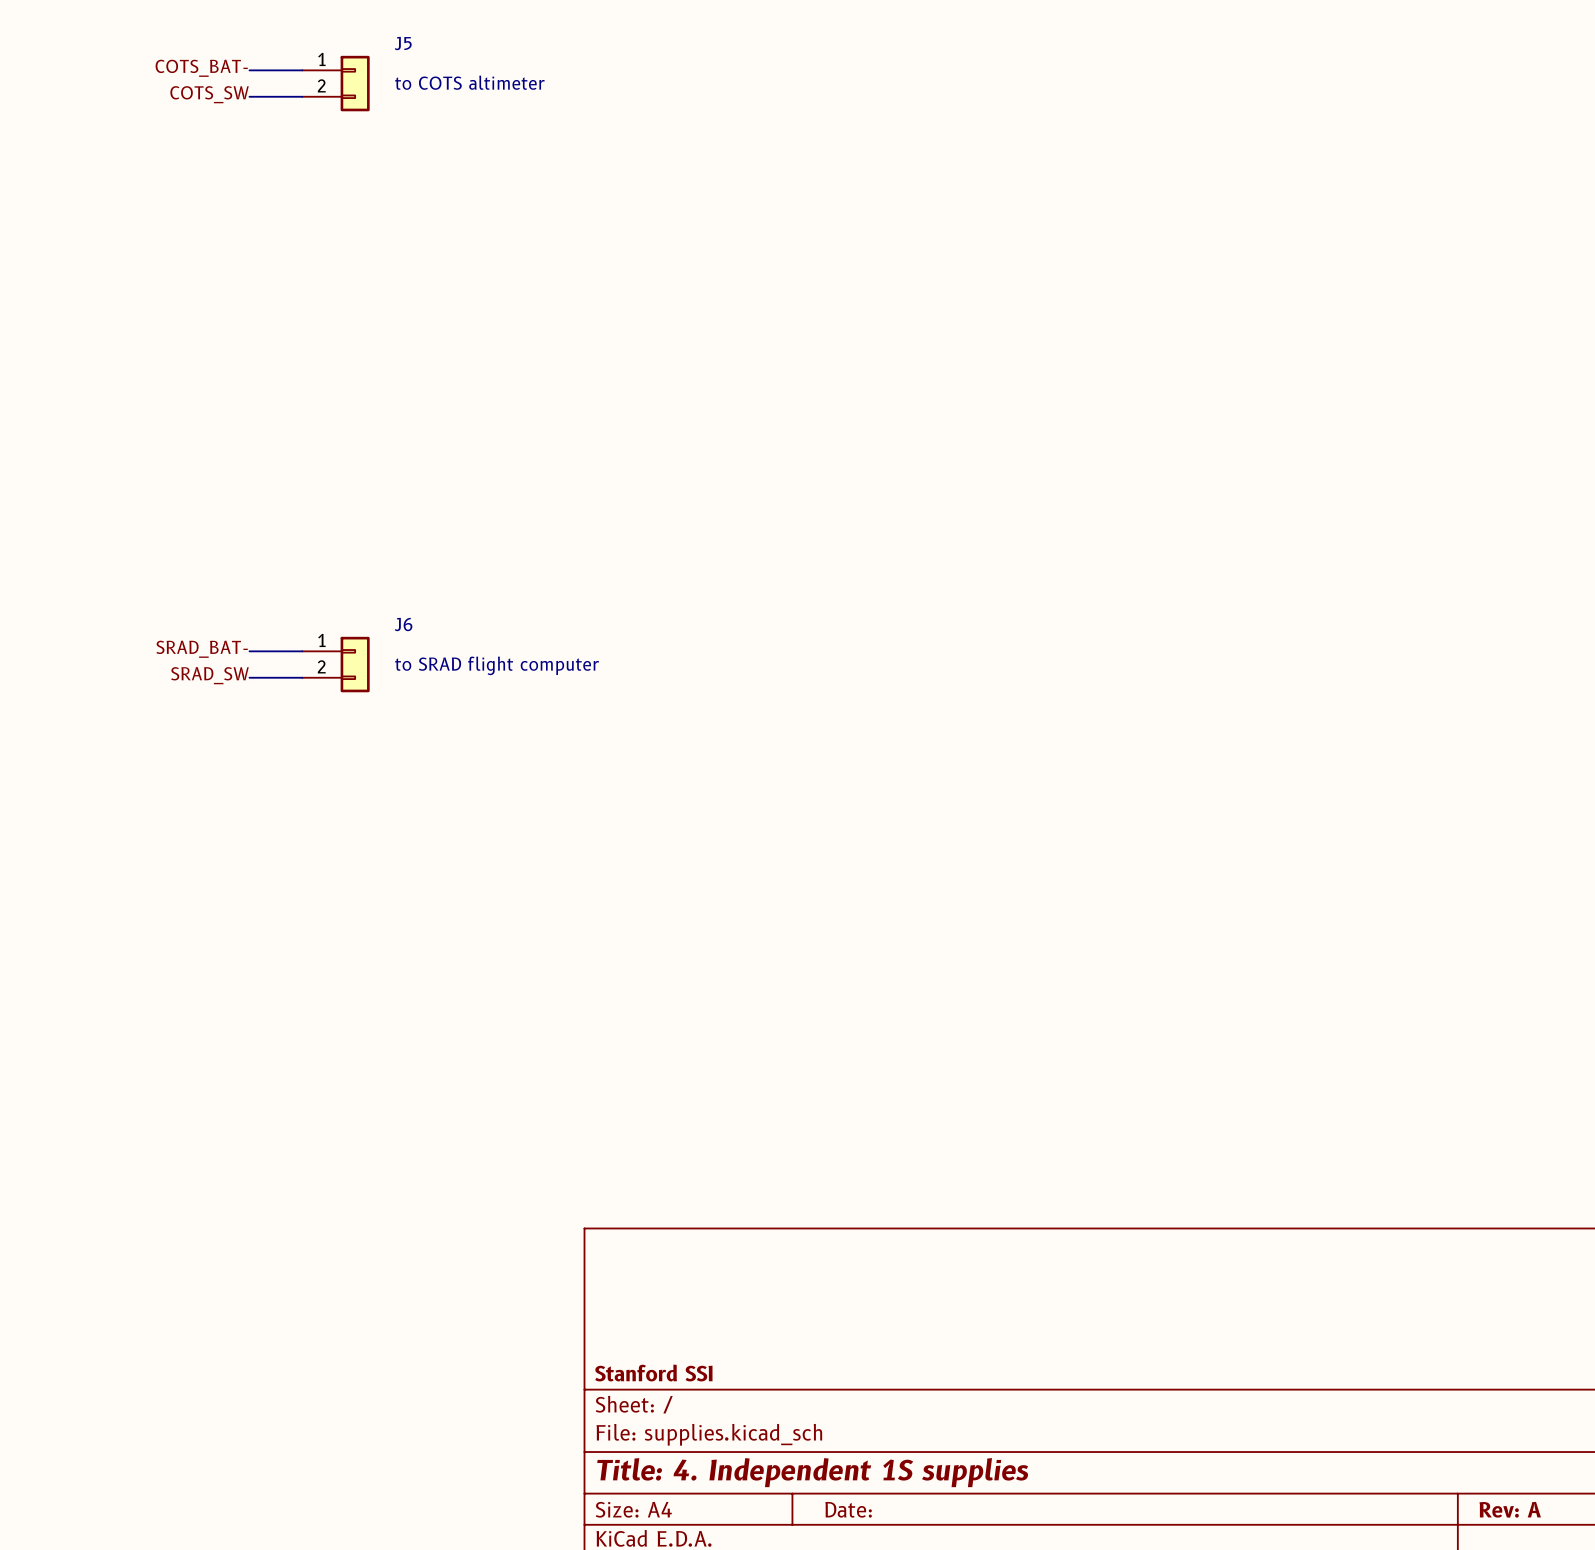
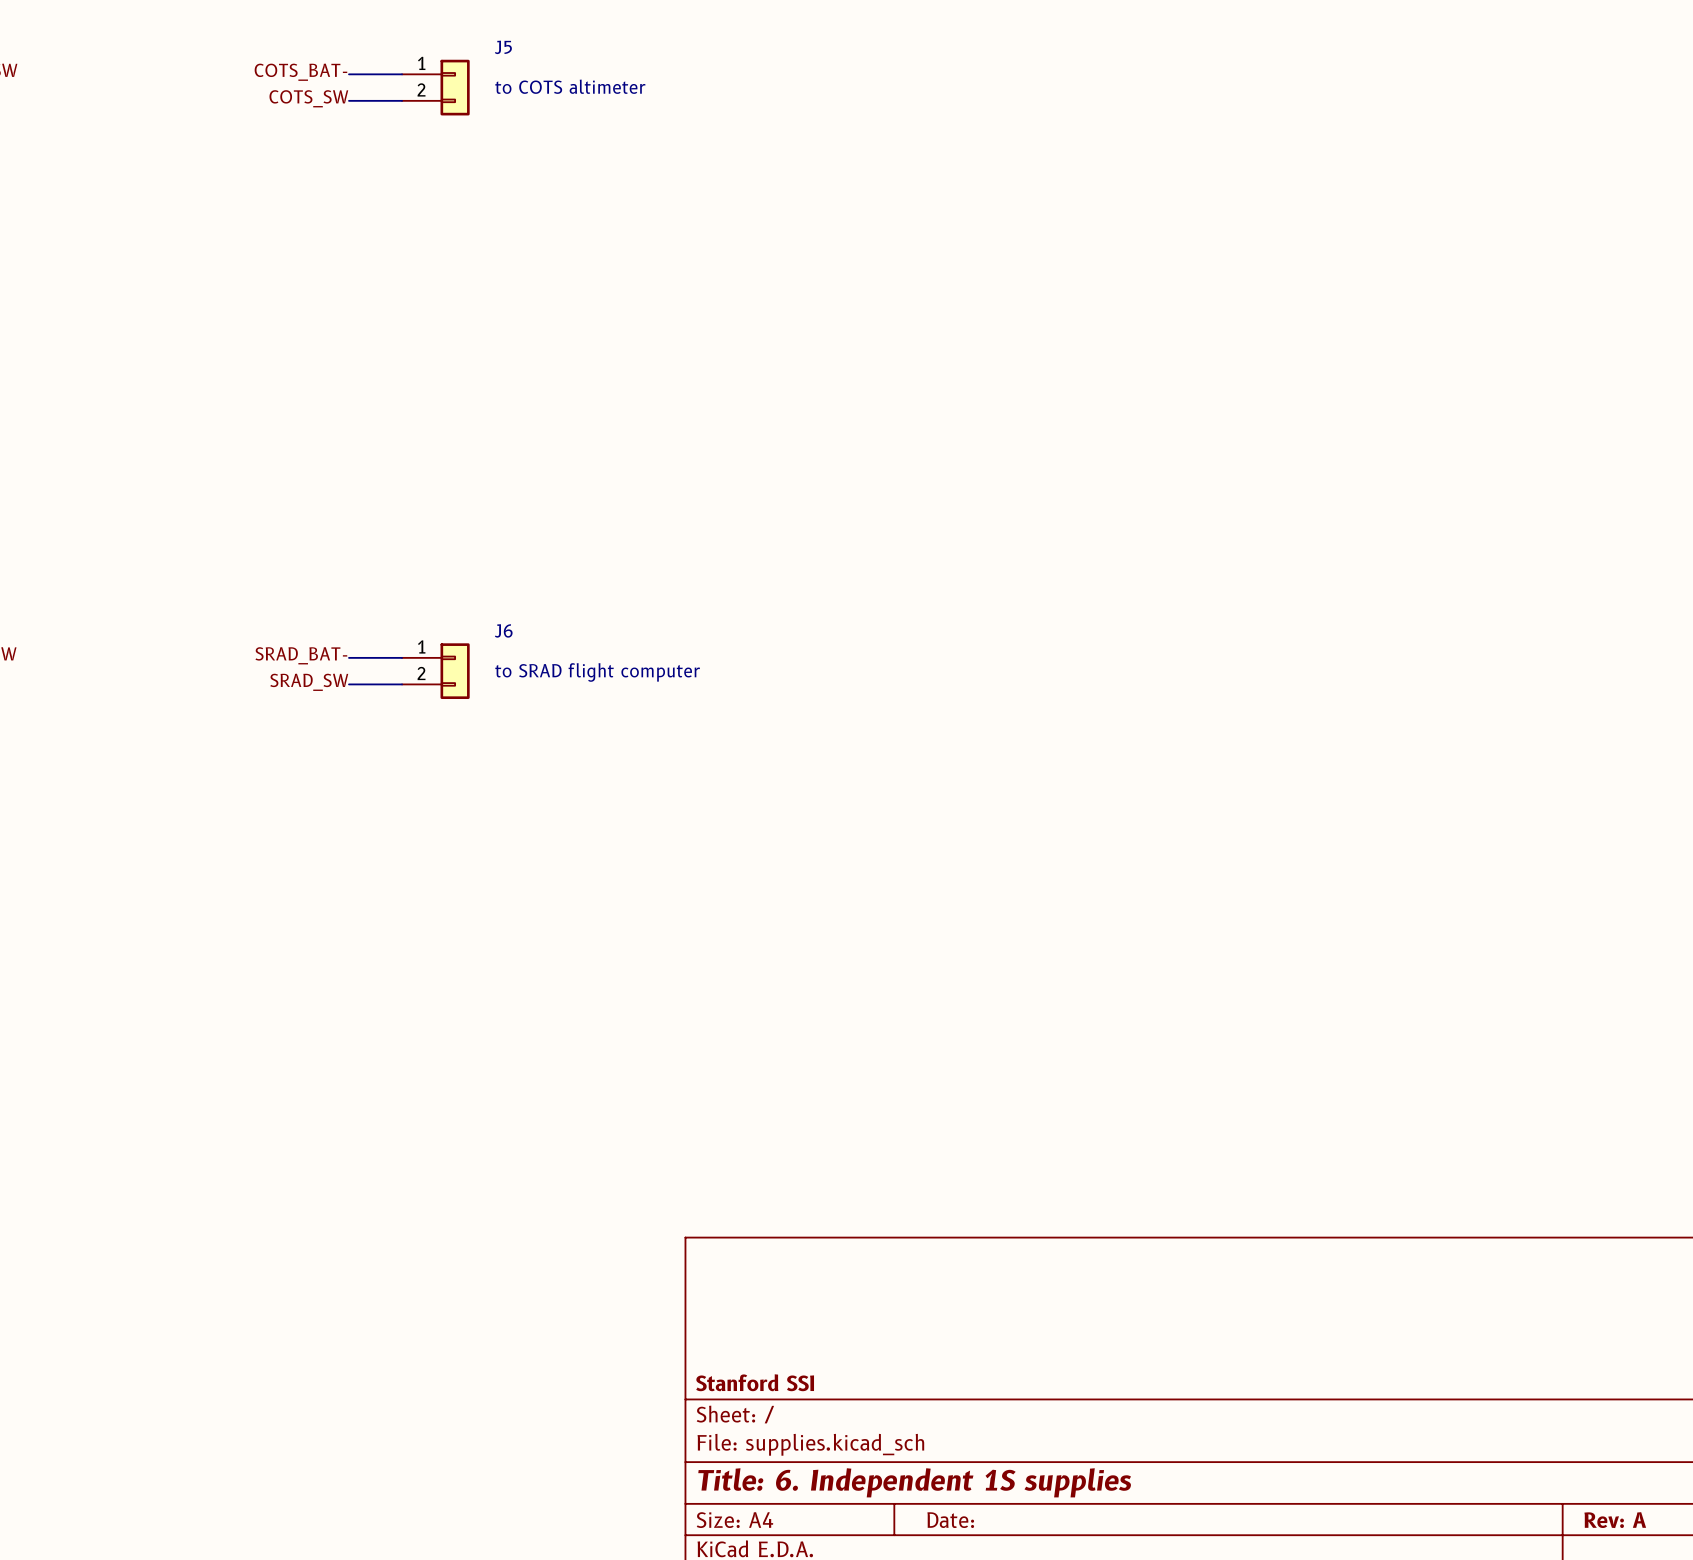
title block: Title: 4. Independent 1S supplies (812, 1472) -> Title: 6. Independent 1S supplies (914, 1482)

